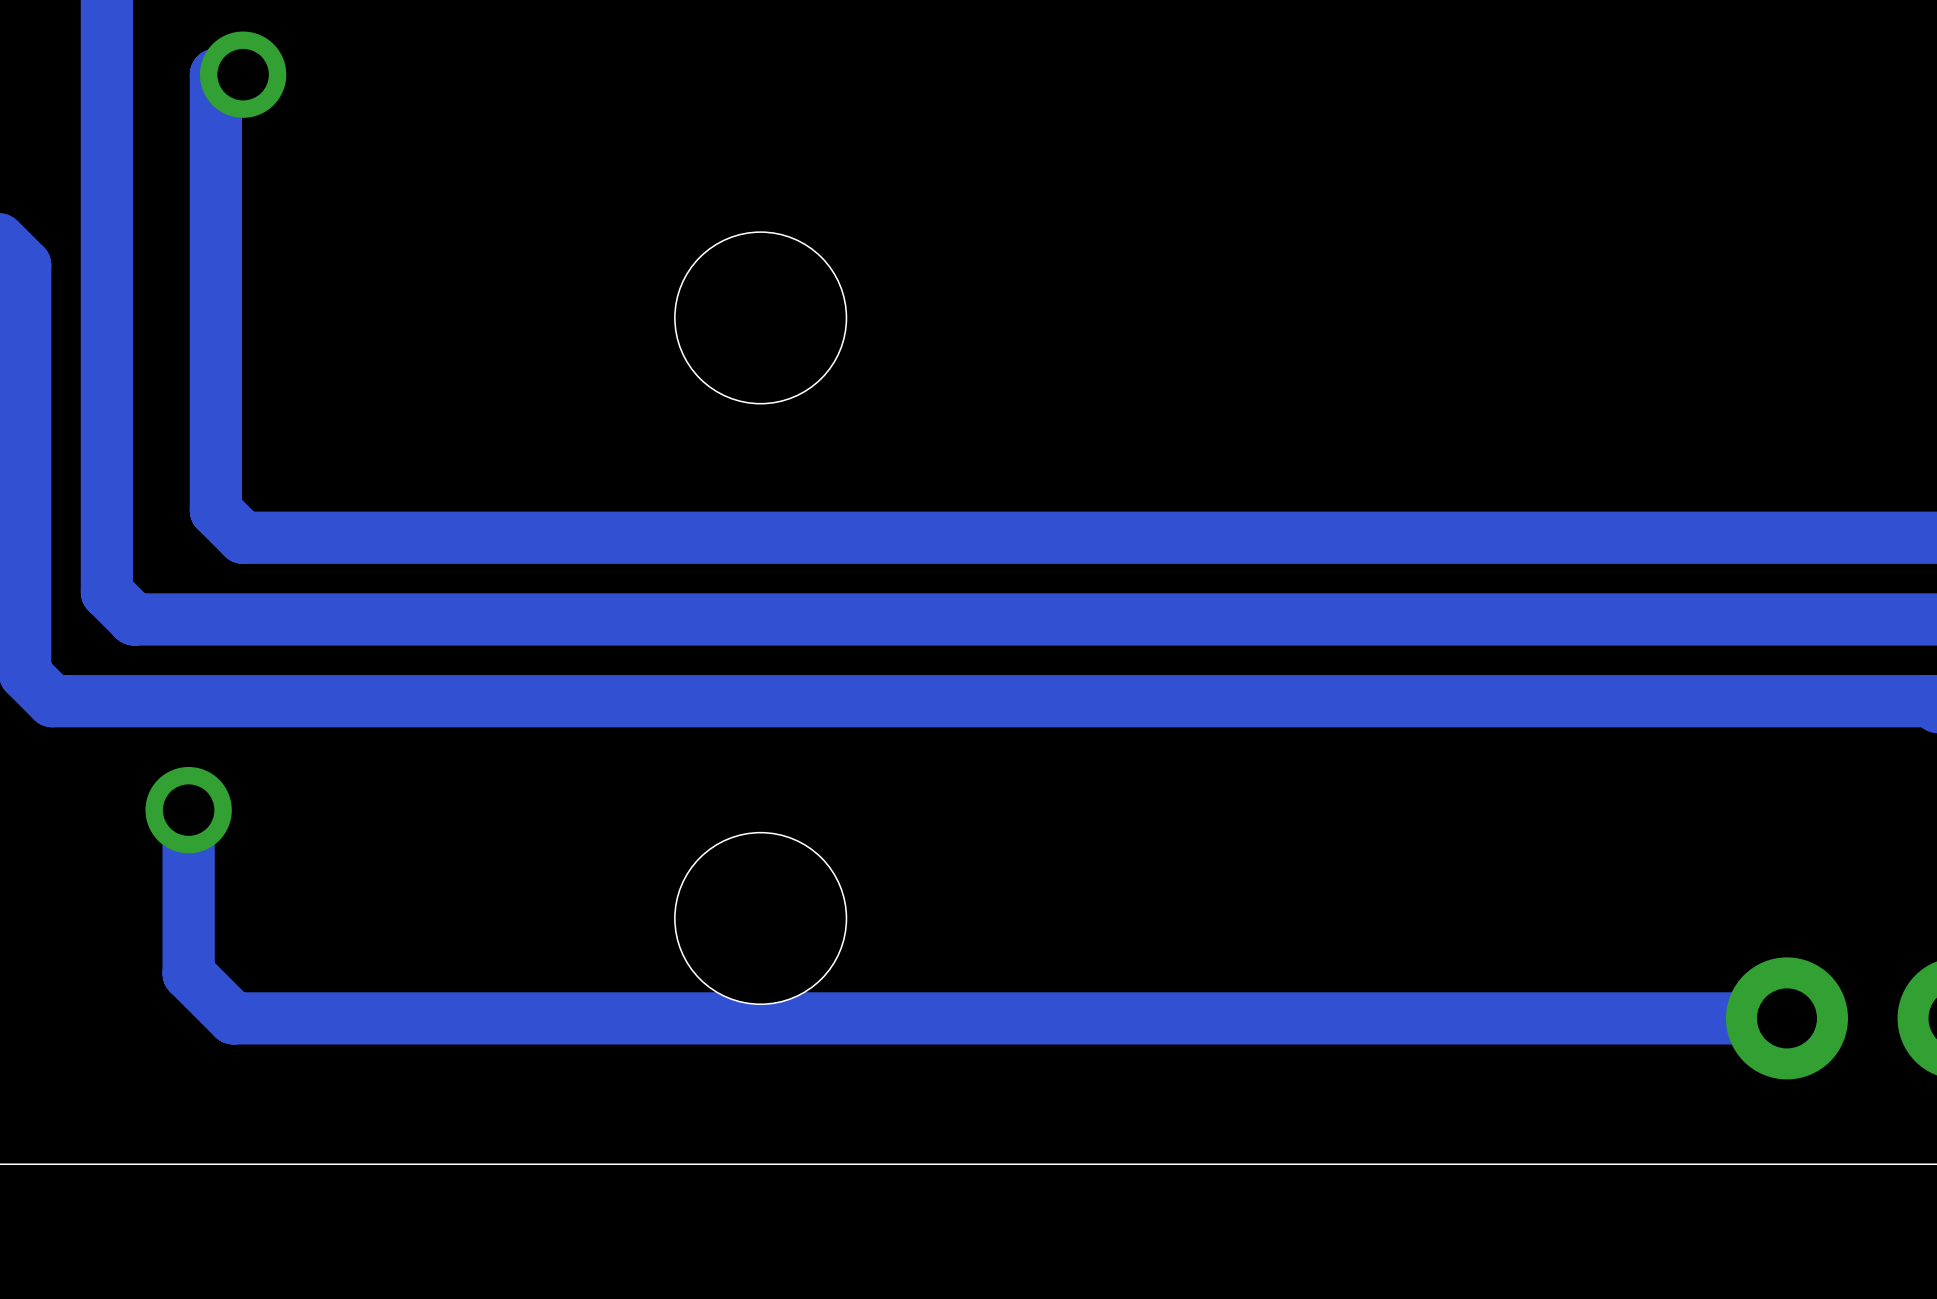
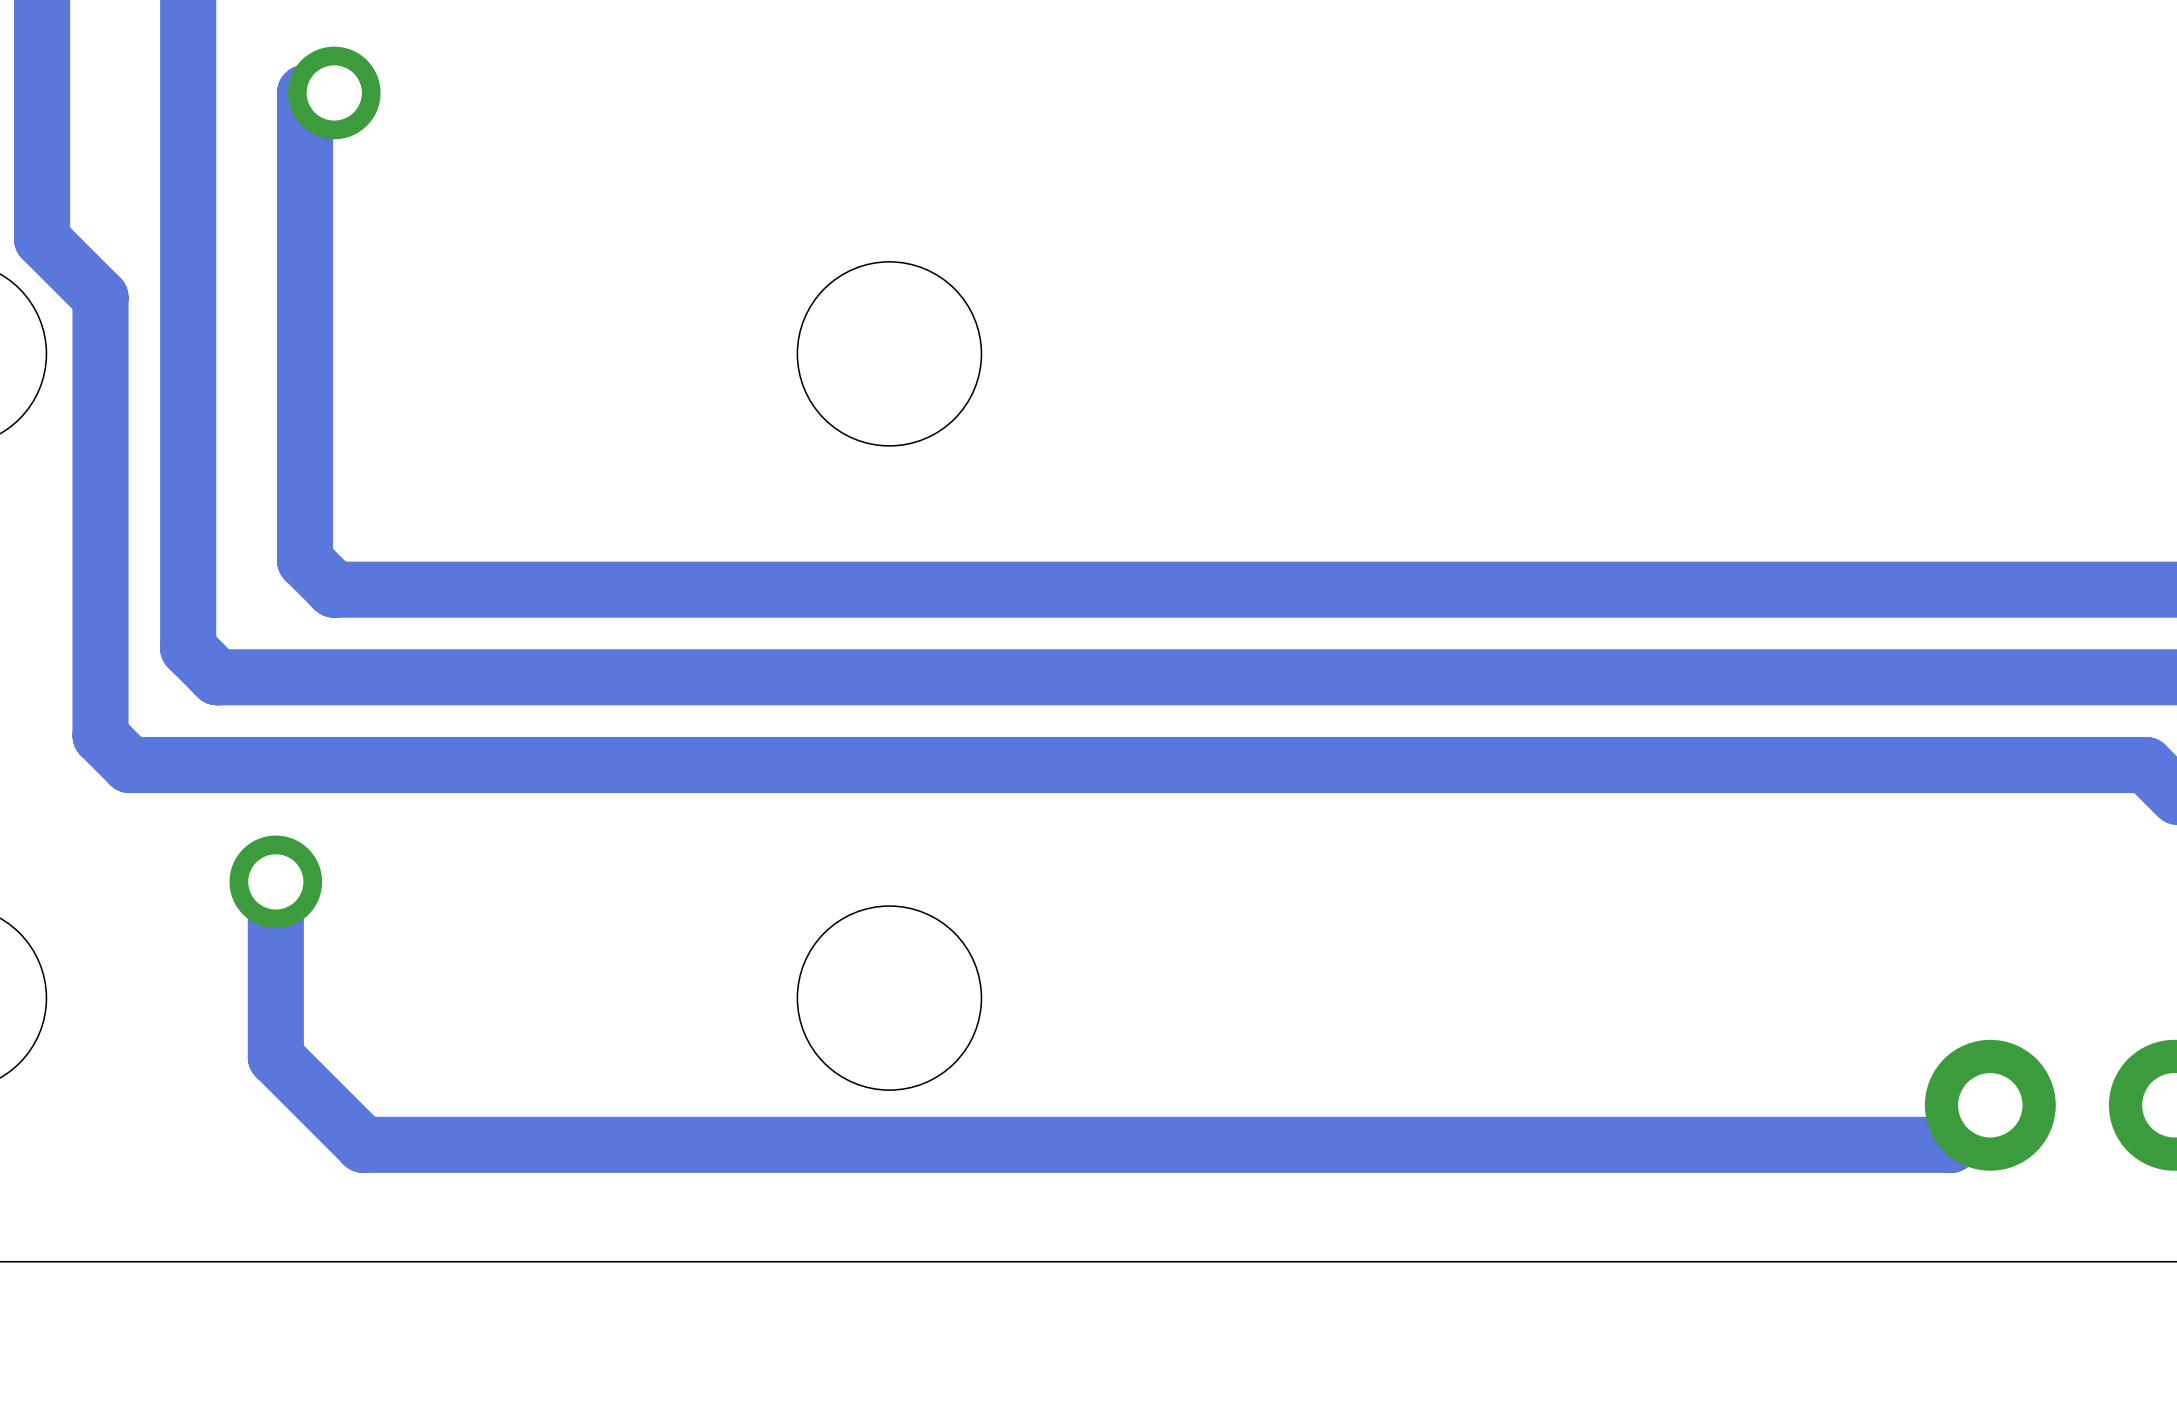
track: (1786, 1018) (233, 1018) -> (1990, 1105) (1950, 1144) (363, 1144) (323, 1105)

